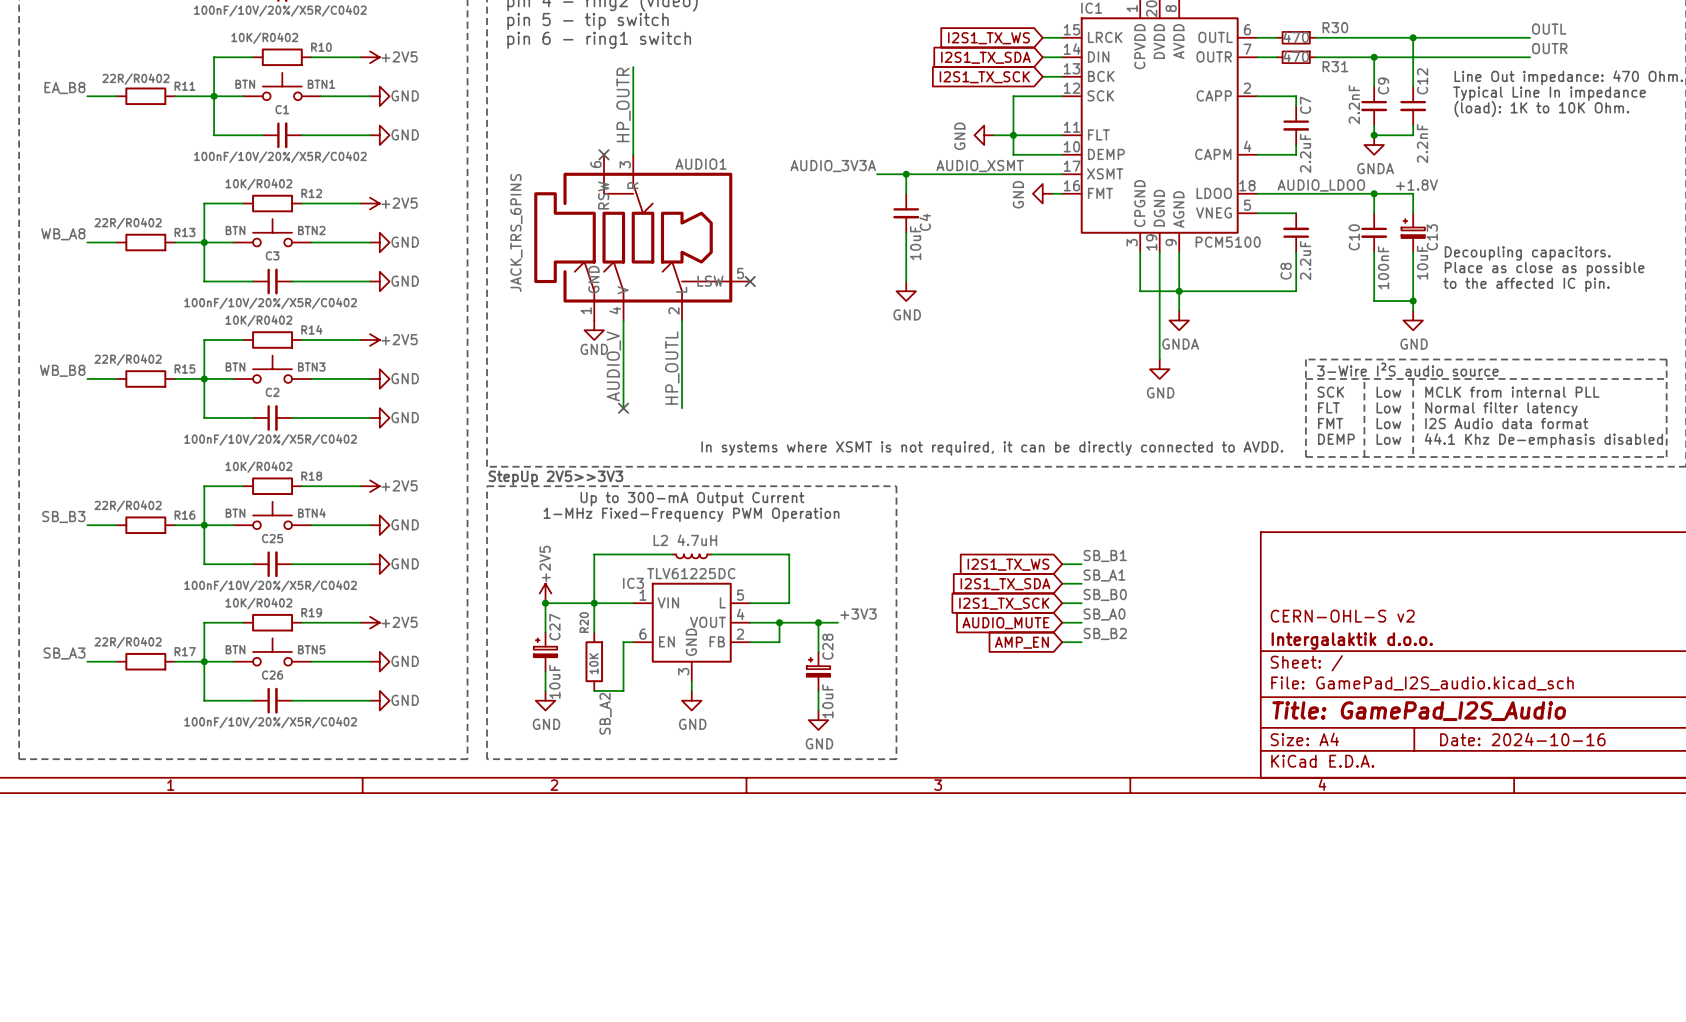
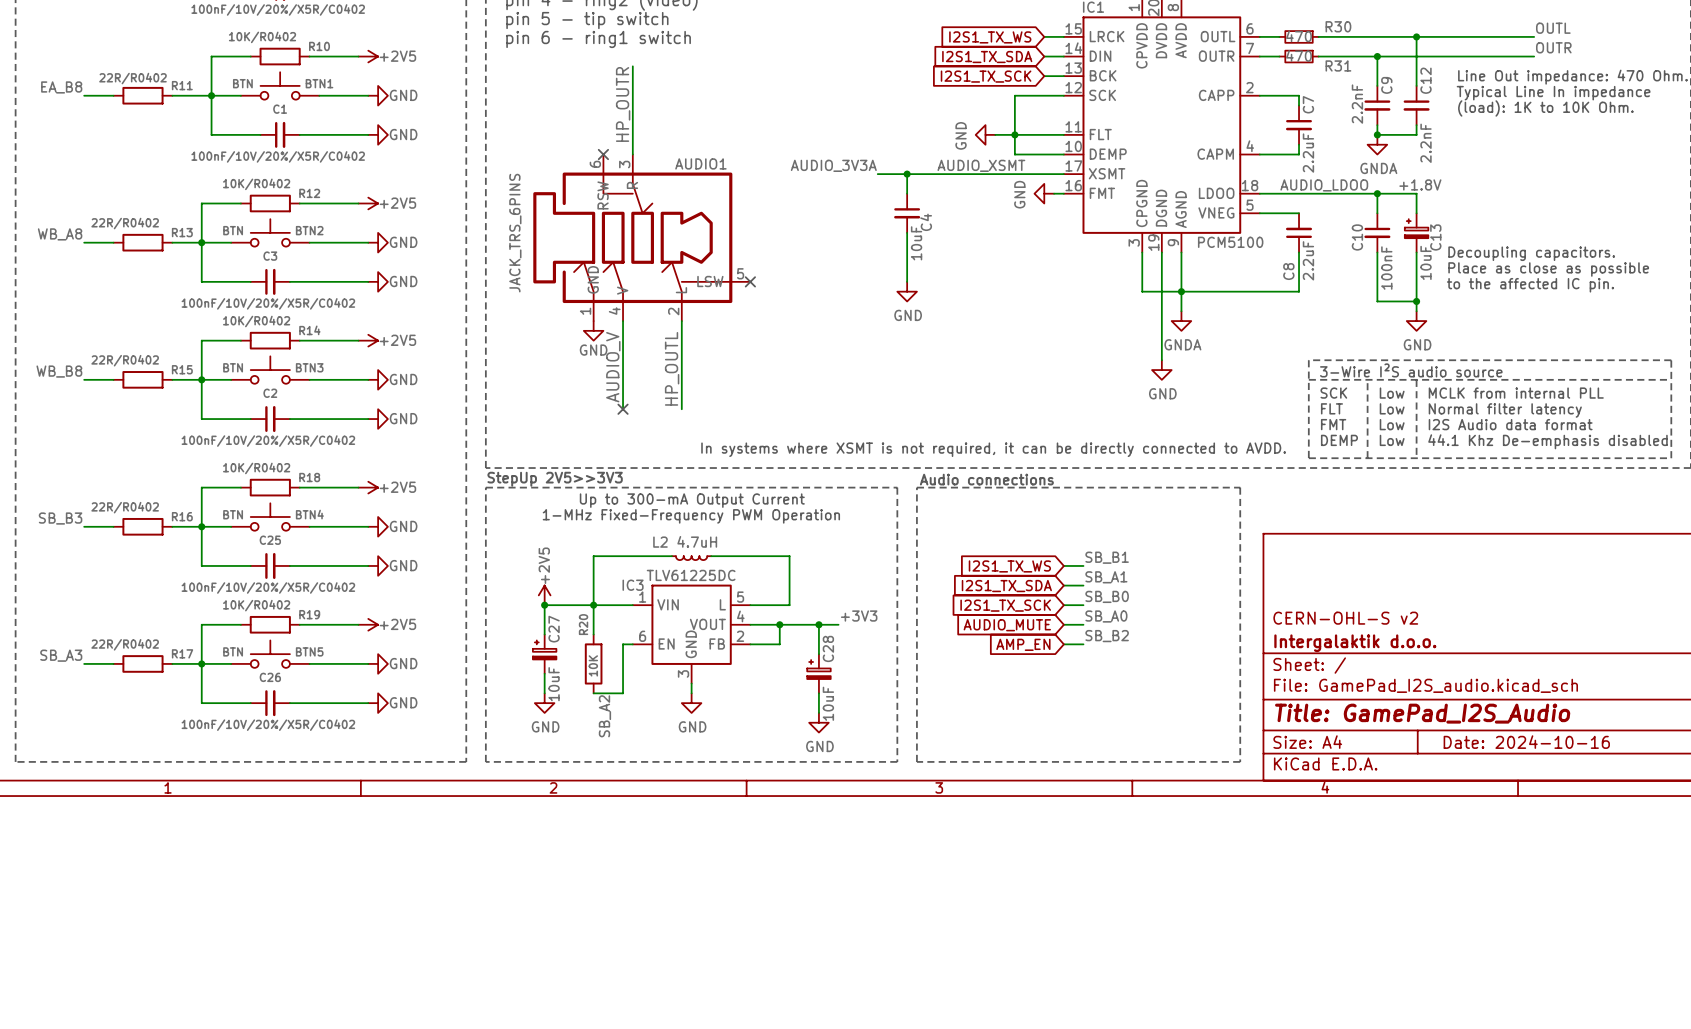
text: none -> Audio connections (986, 479)
line: none -> (916, 487) (1240, 487) (1240, 761) (916, 761) (916, 487)

